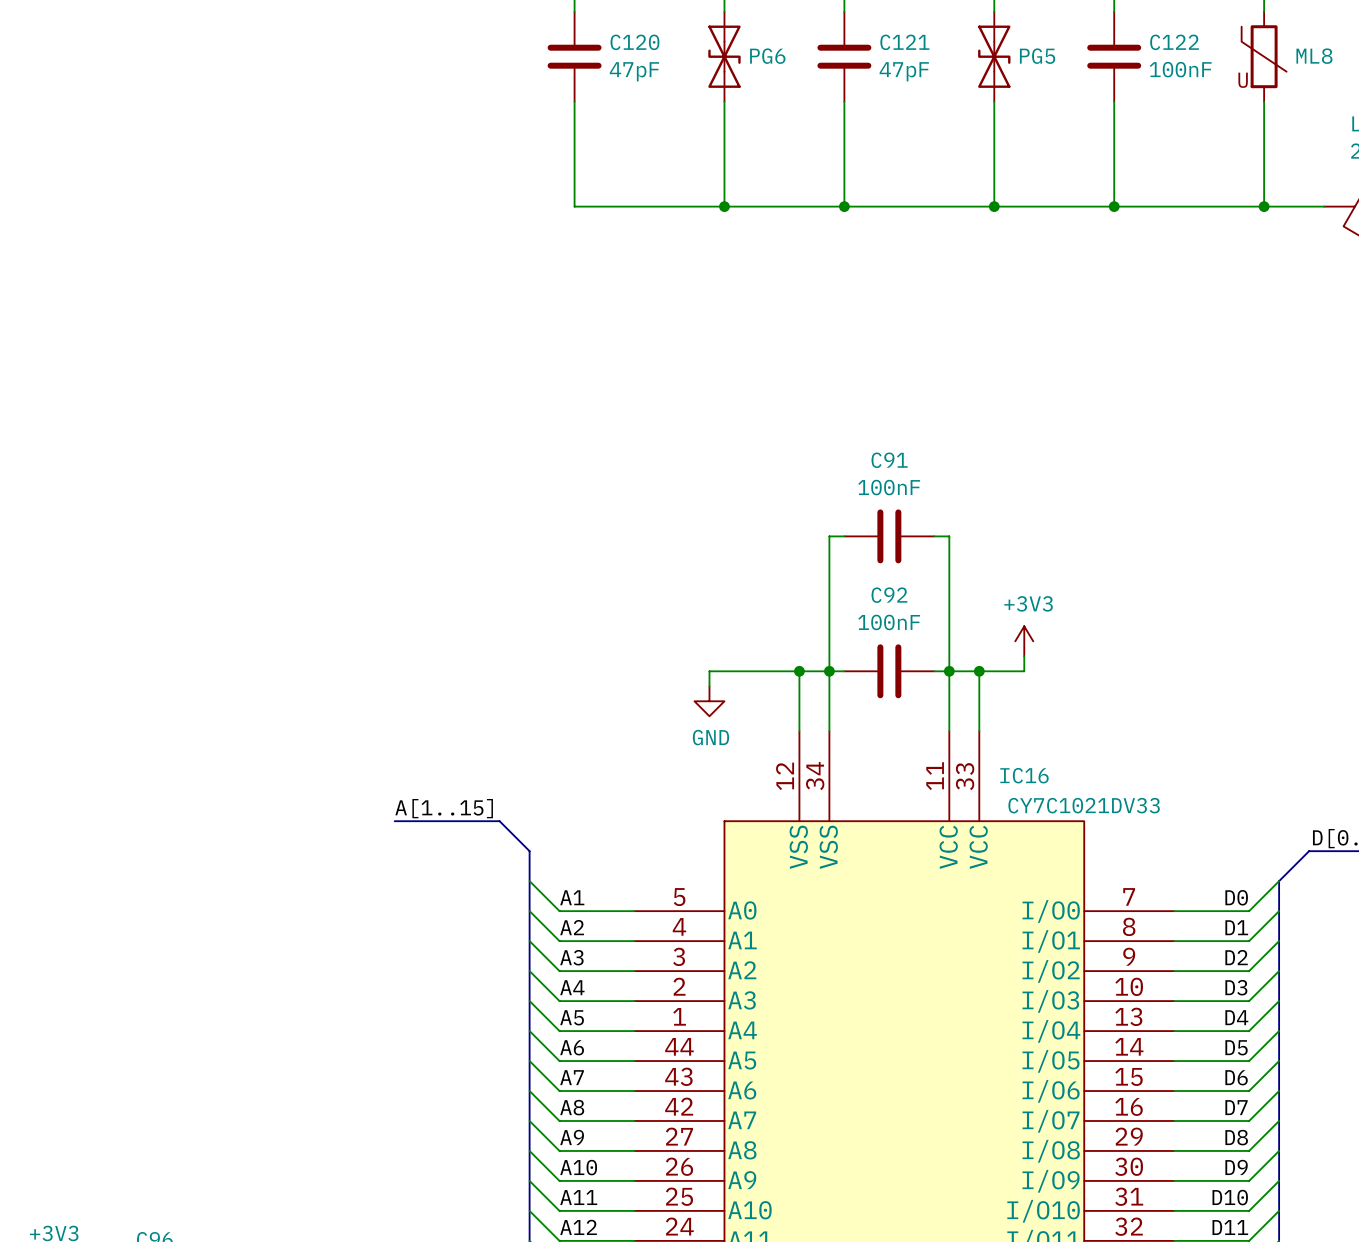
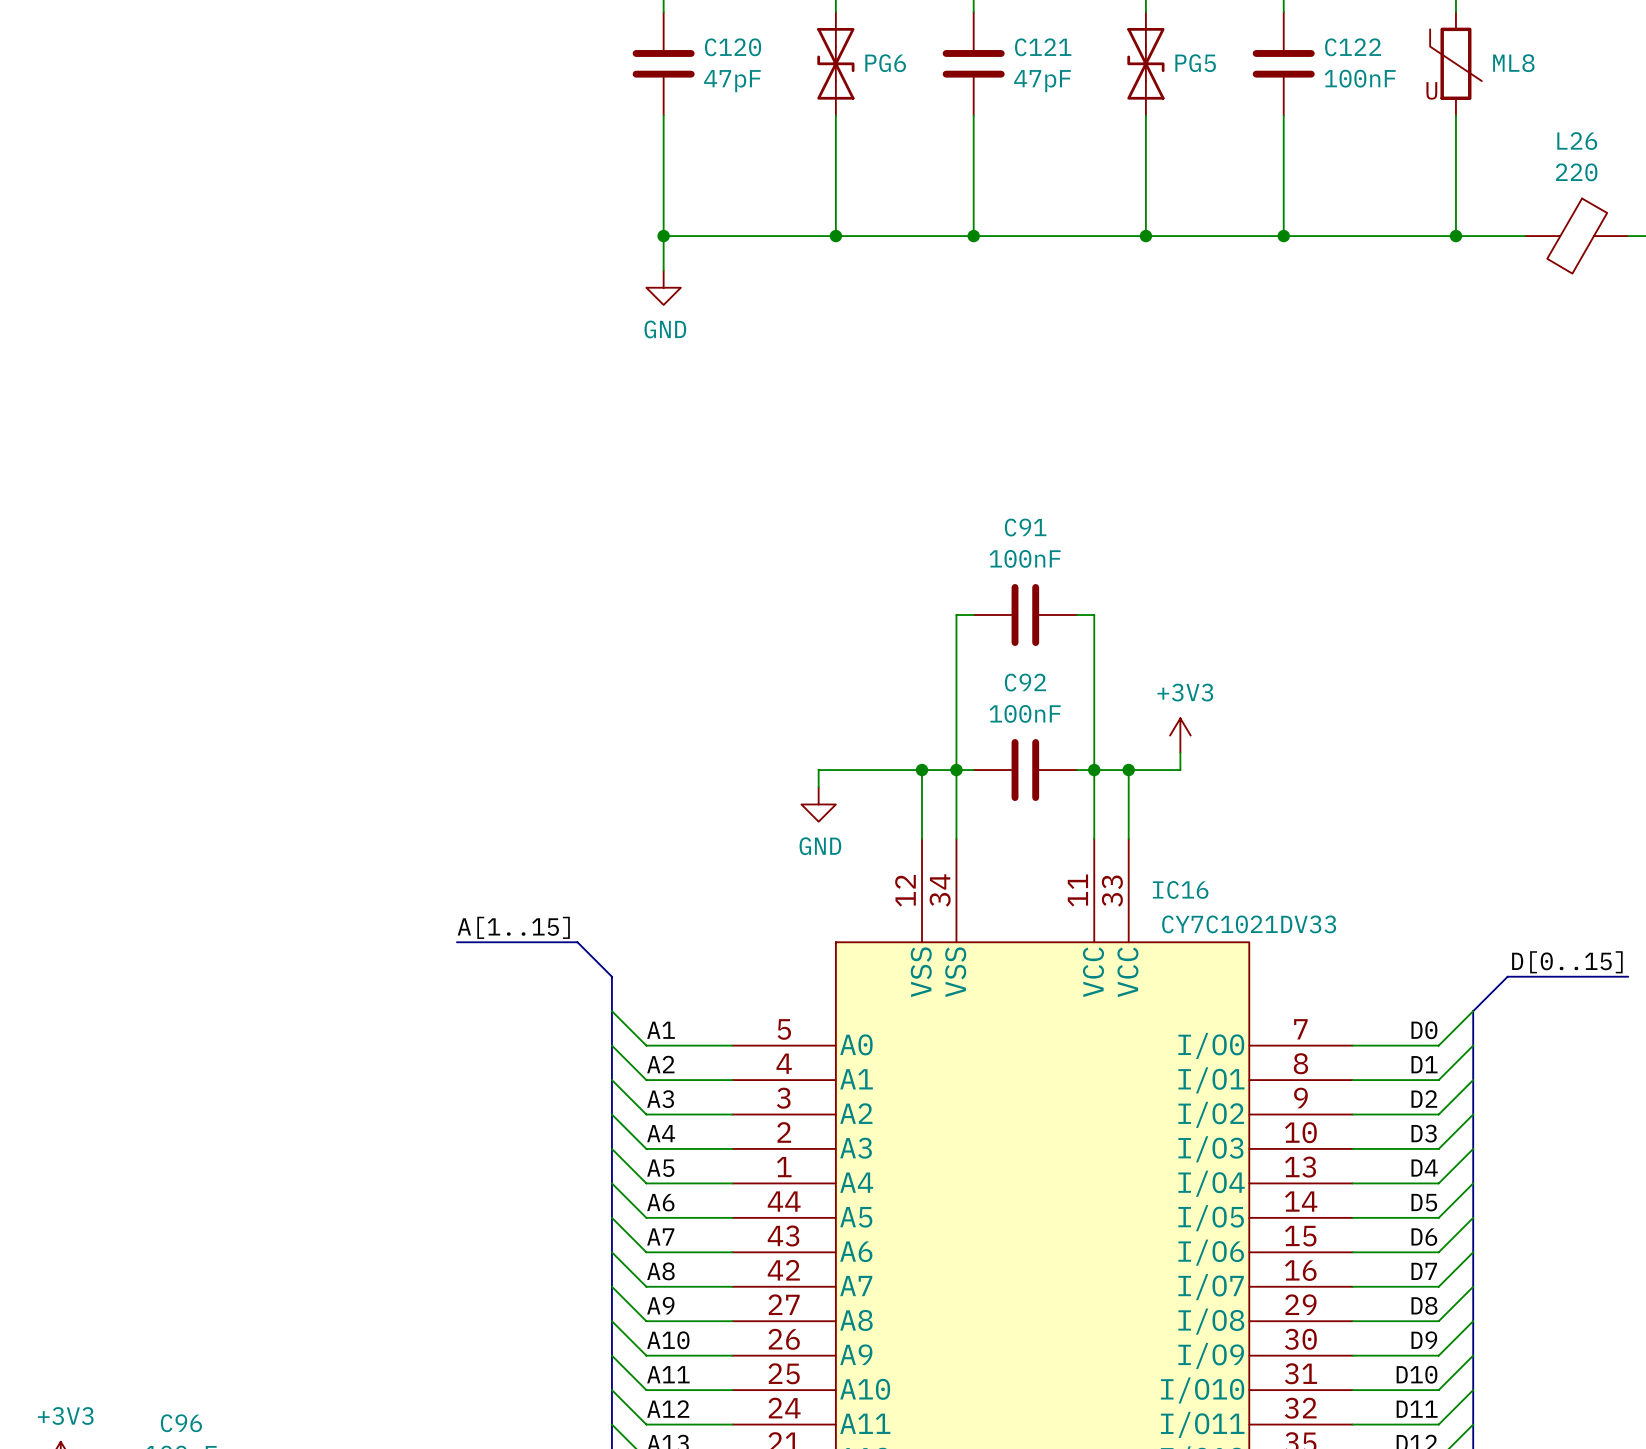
wire: none -> (663, 236) (663, 270)
junction: none -> (663, 236)
power symbol: none -> GND (663, 287)

